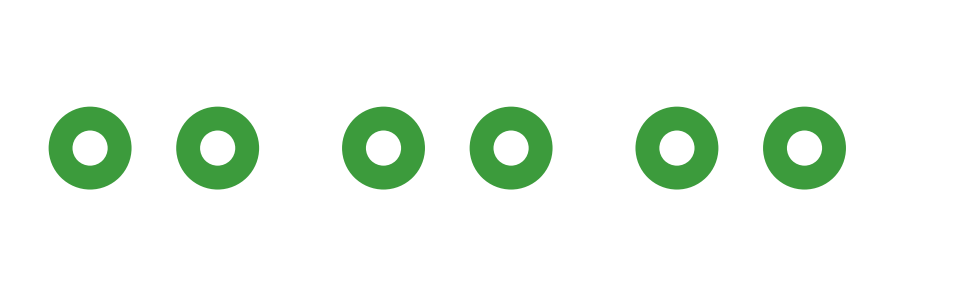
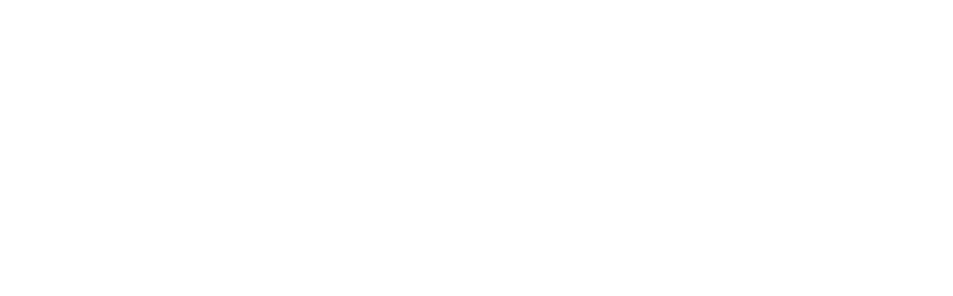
part: (153, 148) -> none
part: (447, 148) -> none
part: (740, 148) -> none

